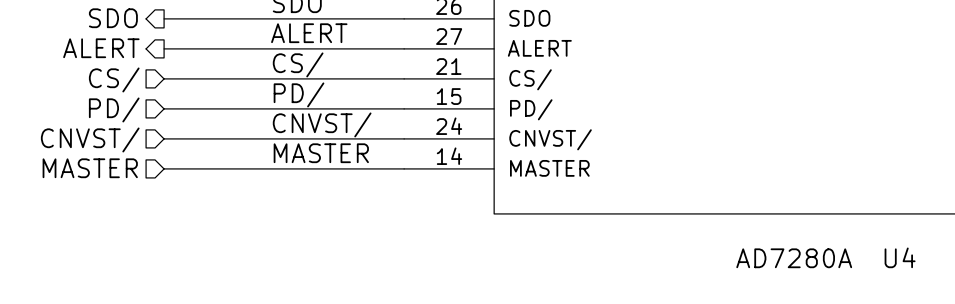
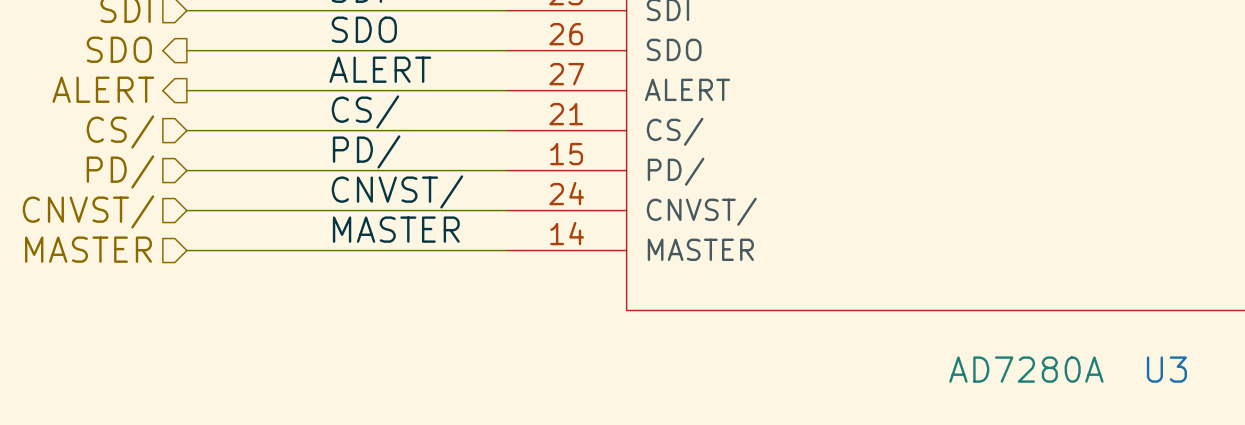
U4 name: U4 (900, 257) -> U3 (1166, 369)

